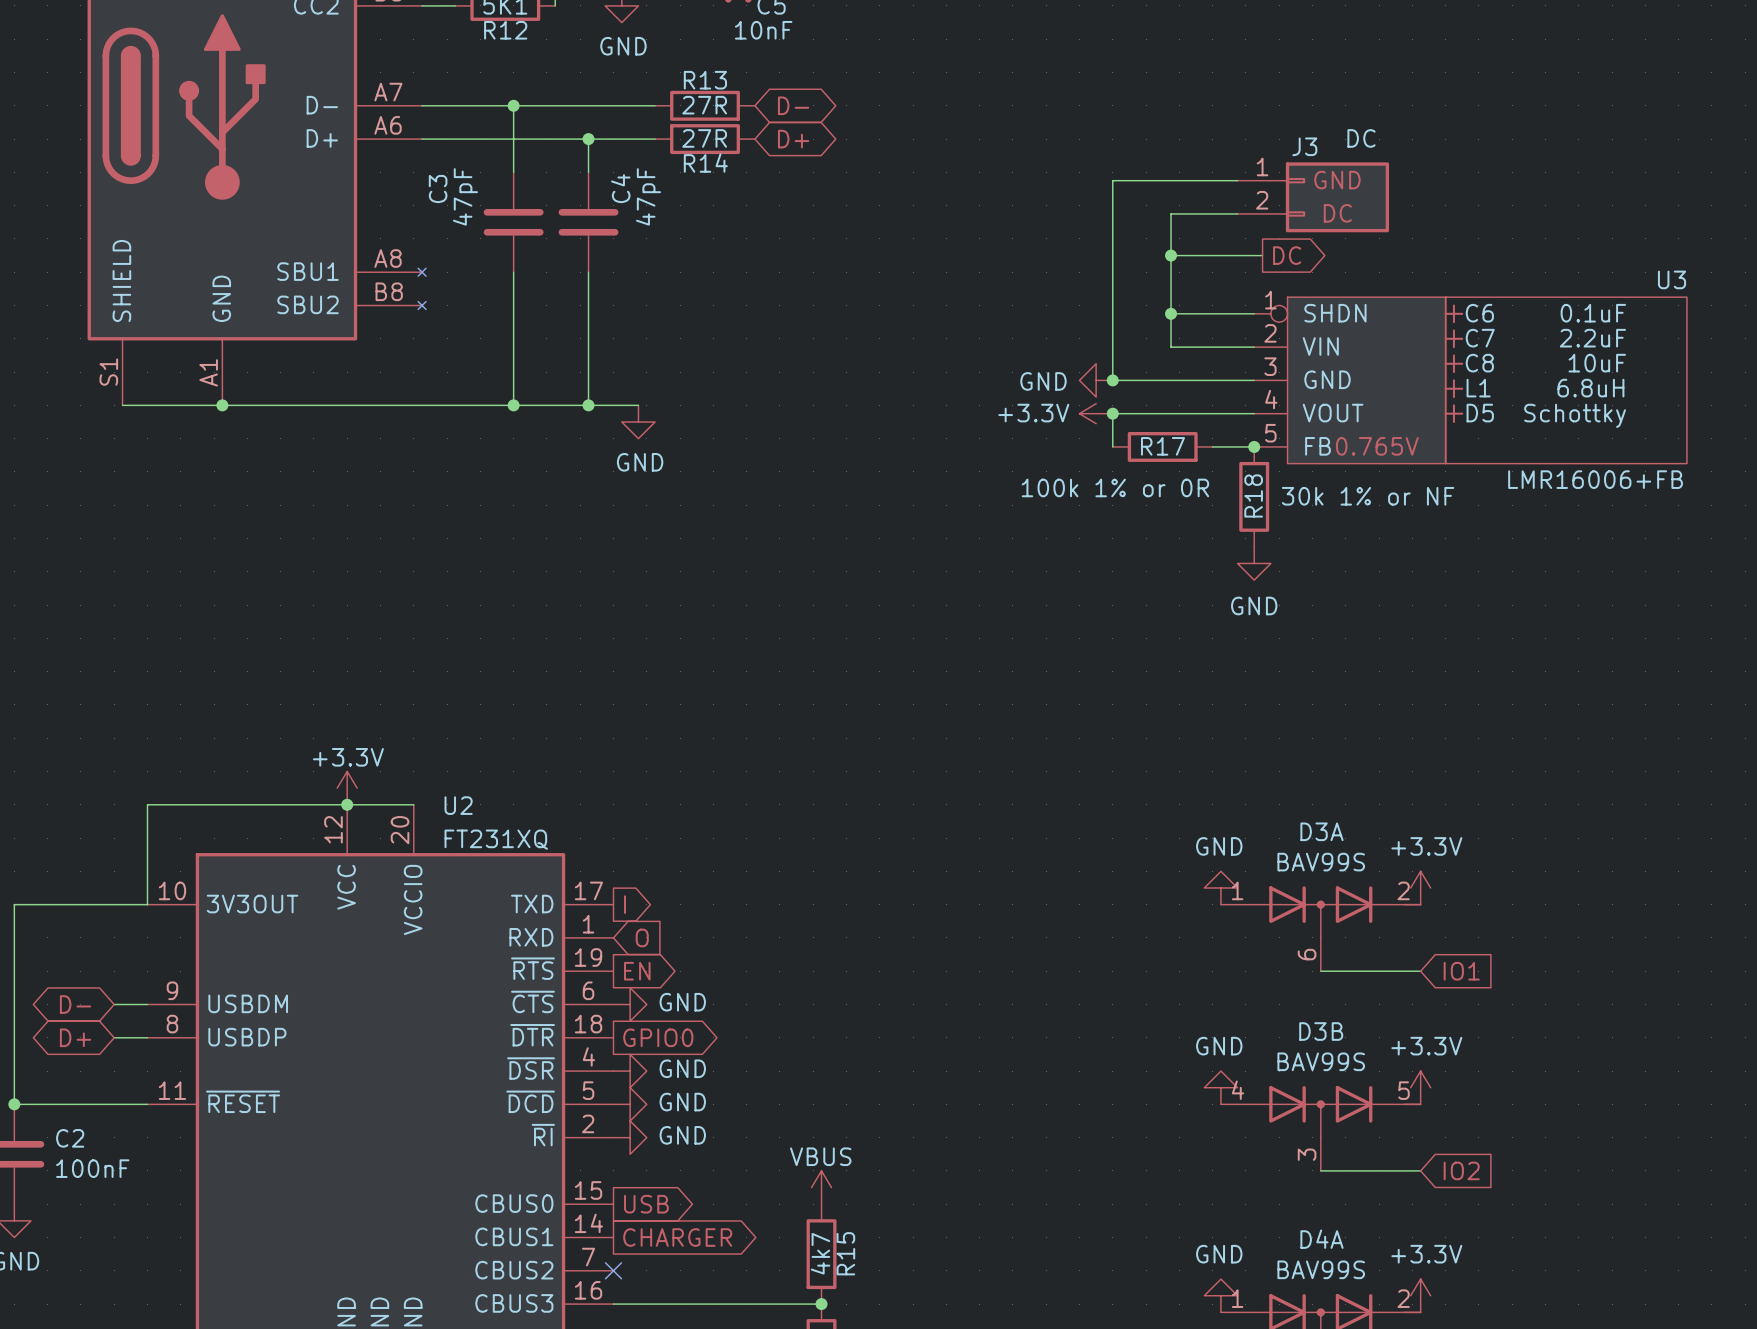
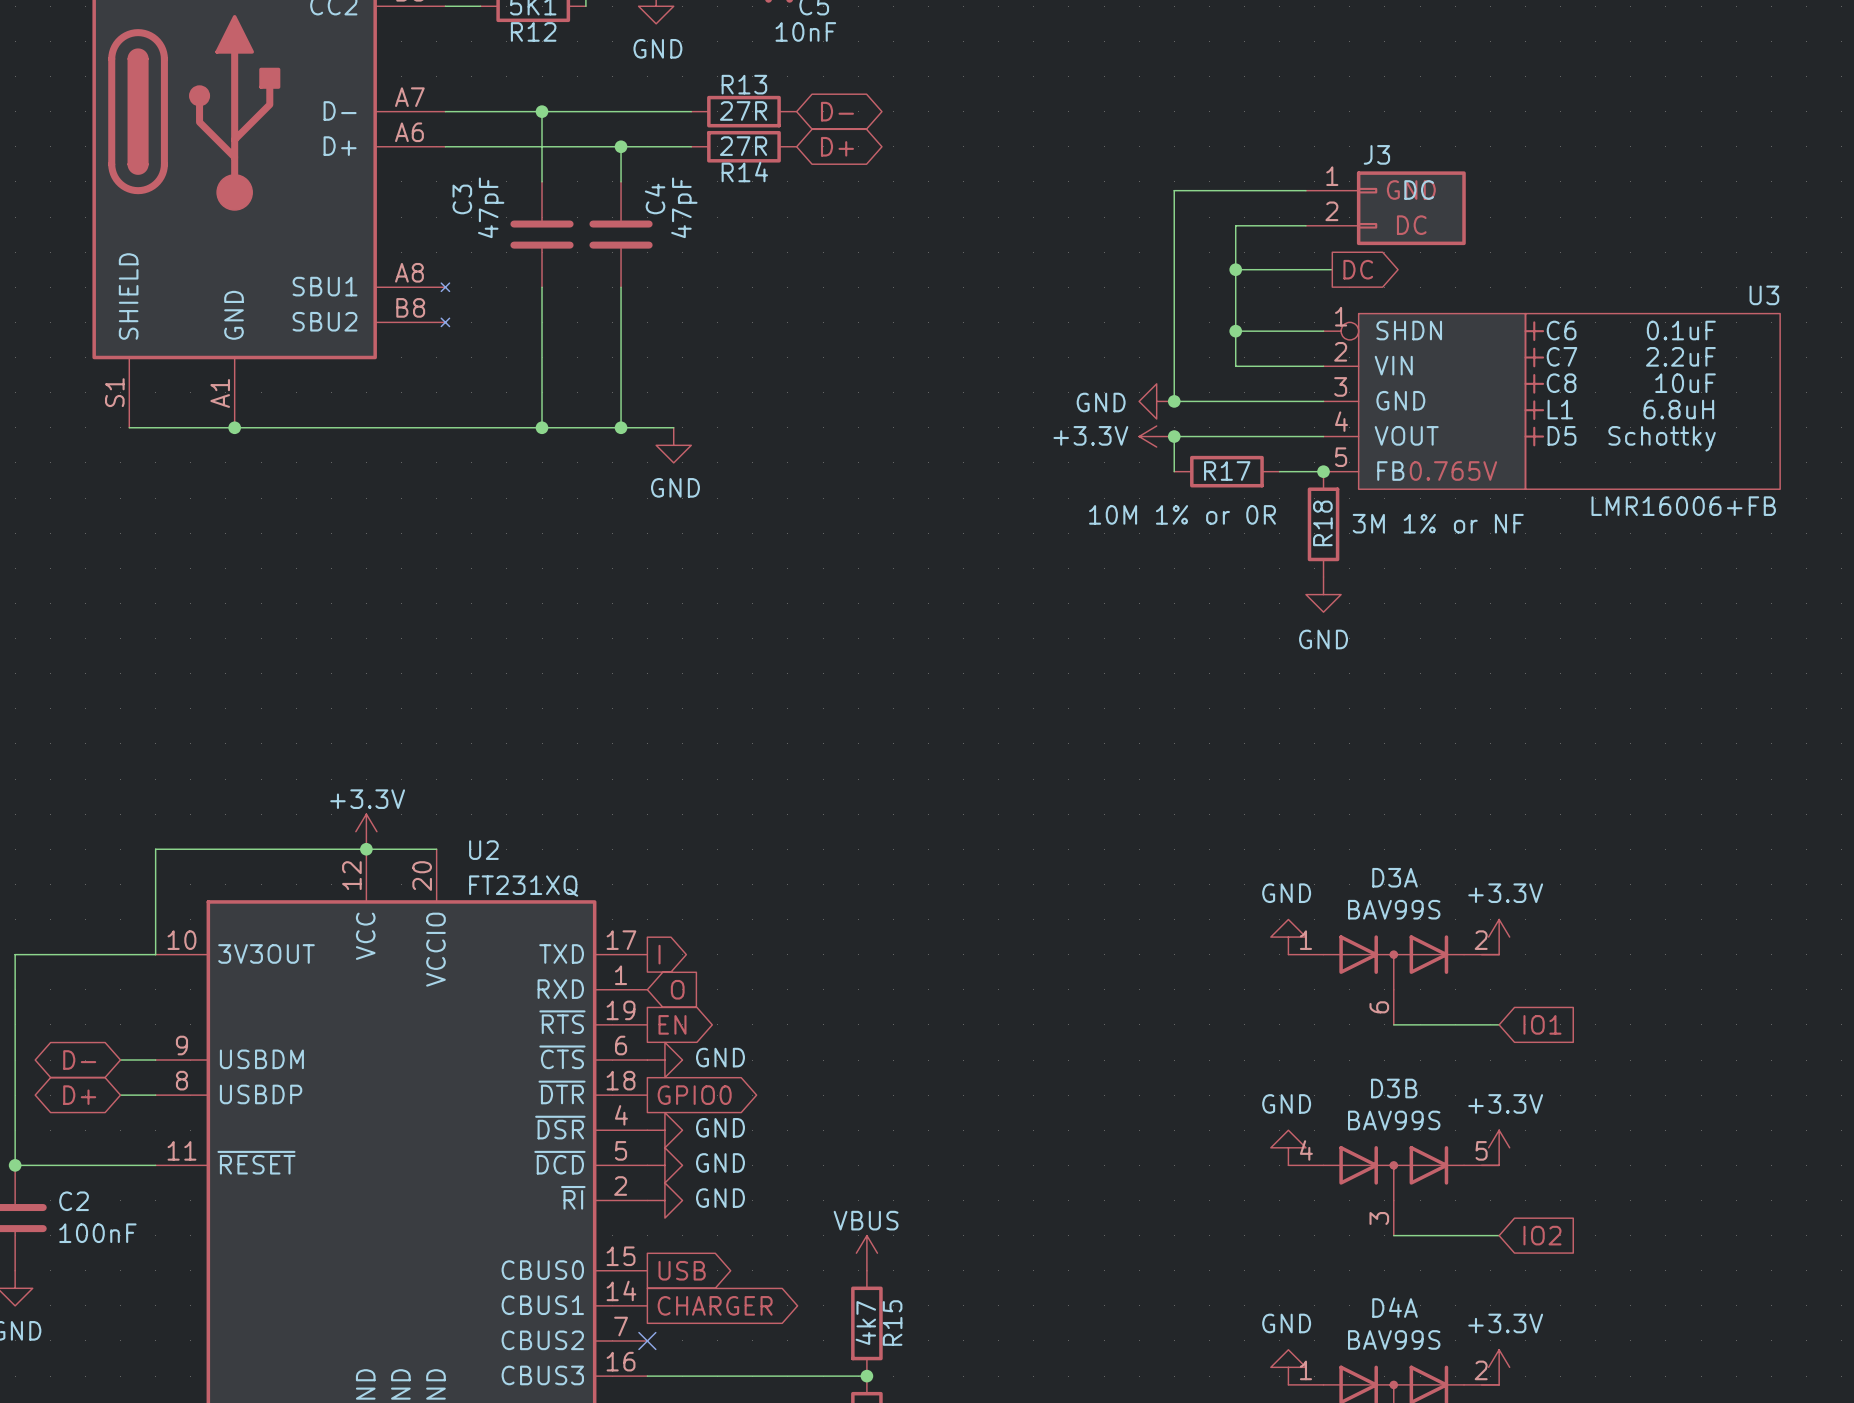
J3 value position: DC (1361, 138) -> DC (1419, 190)
R17 value: 100k 1% or 0R (1115, 487) -> 10M 1% or 0R (1182, 514)
R18 value: 30k 1% or NF (1368, 496) -> 3M 1% or NF (1438, 523)

